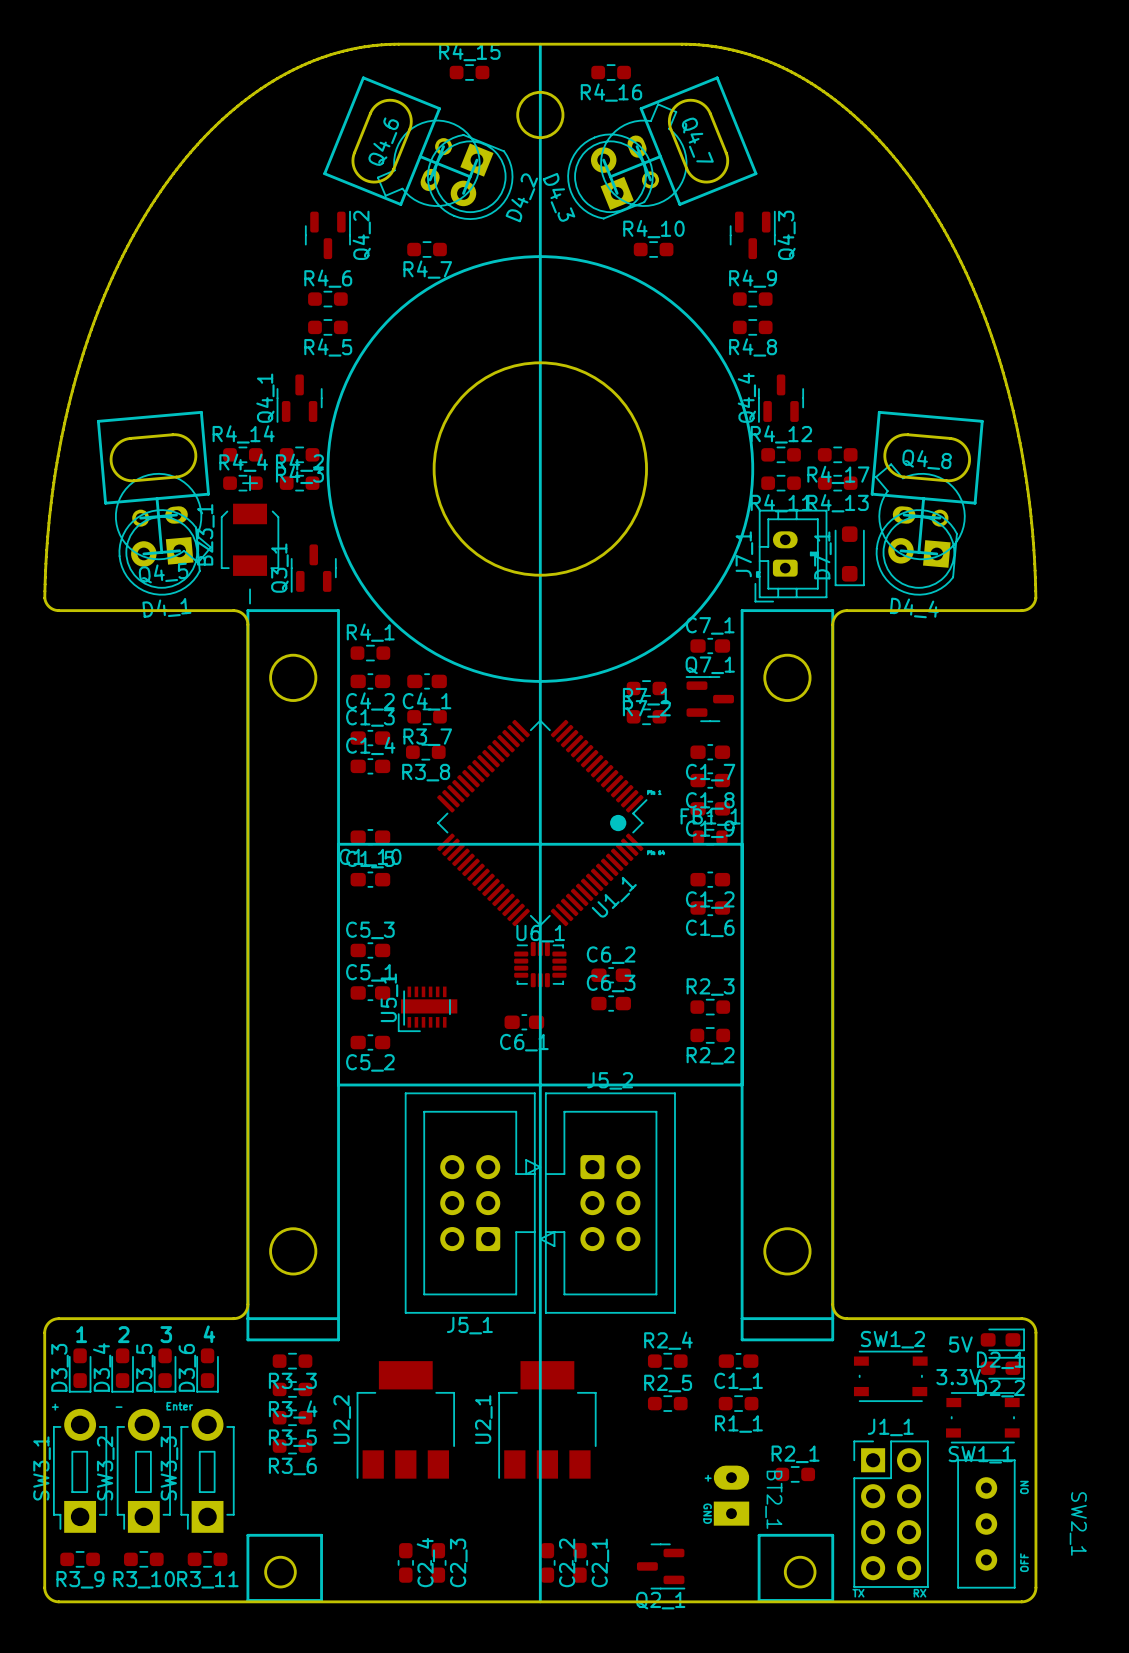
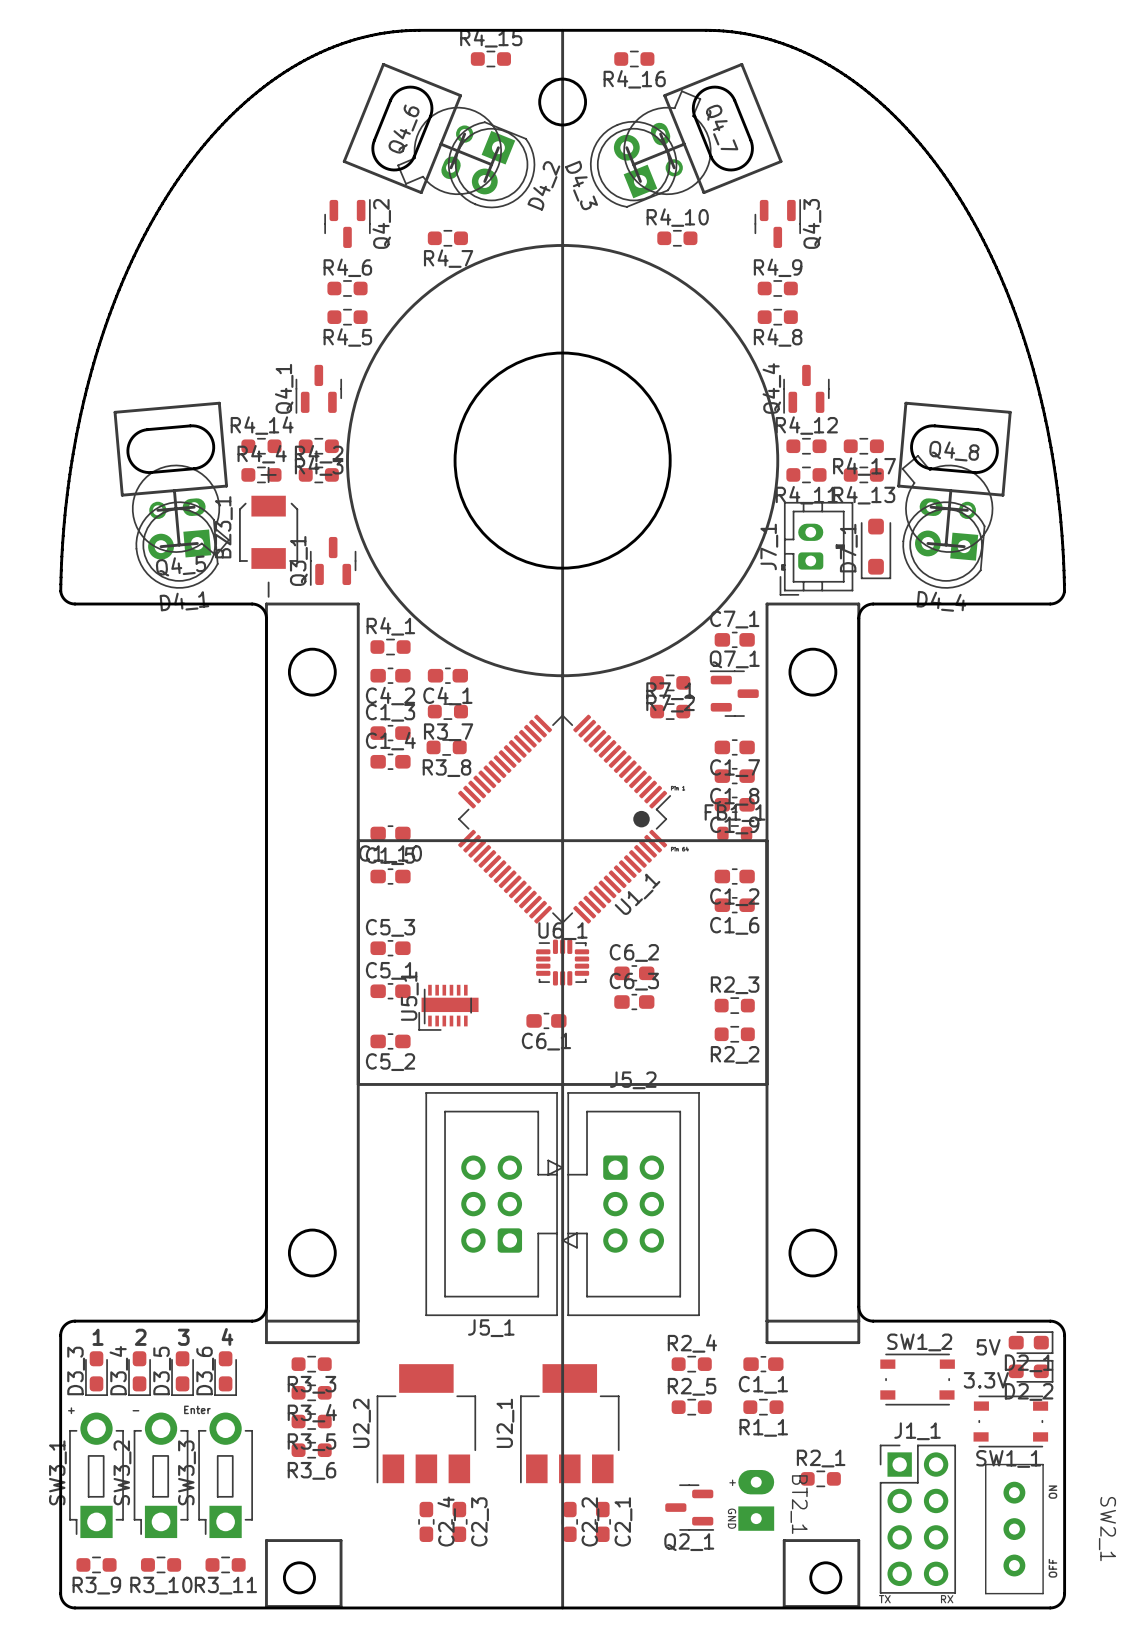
C2_4 position: (405, 1562) -> (426, 1521)
C2_3 position: (438, 1562) -> (459, 1521)
C2_2 position: (547, 1562) -> (569, 1521)
C2_1 position: (579, 1562) -> (602, 1521)
Q2_1 position: (661, 1566) -> (689, 1507)

